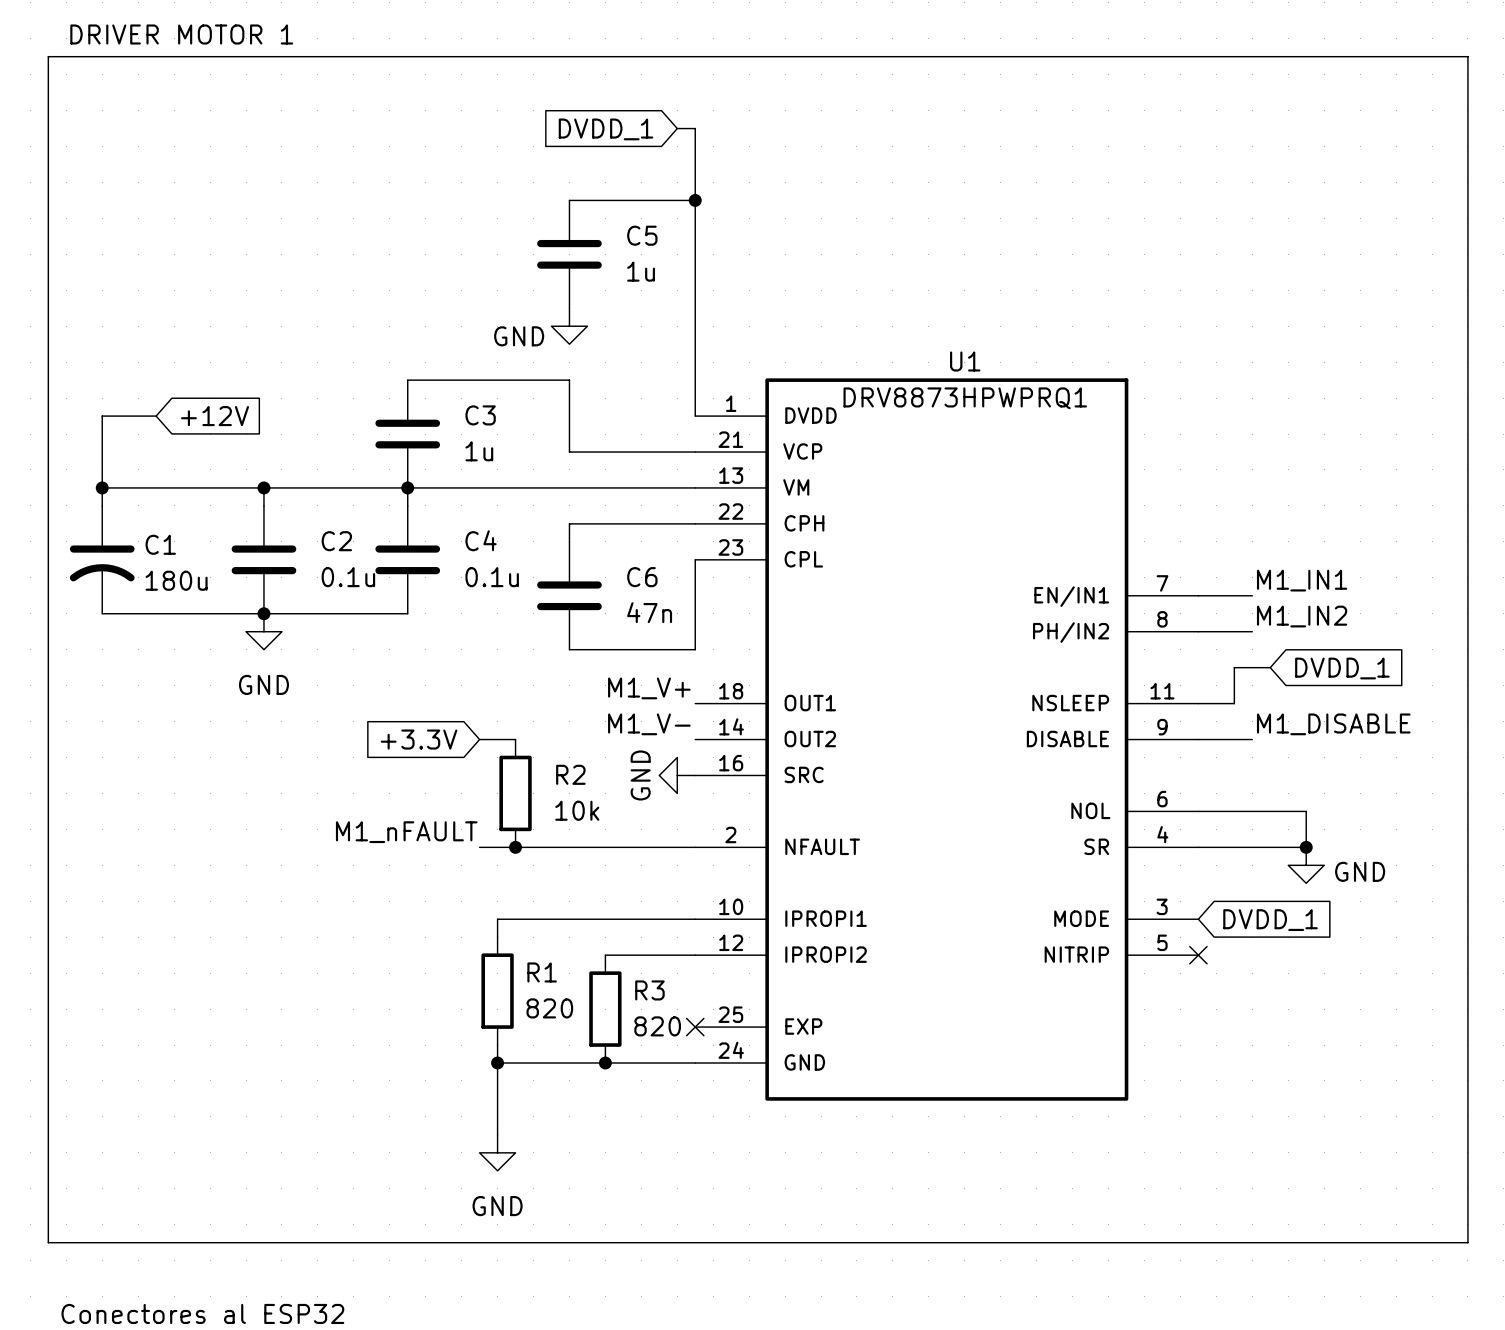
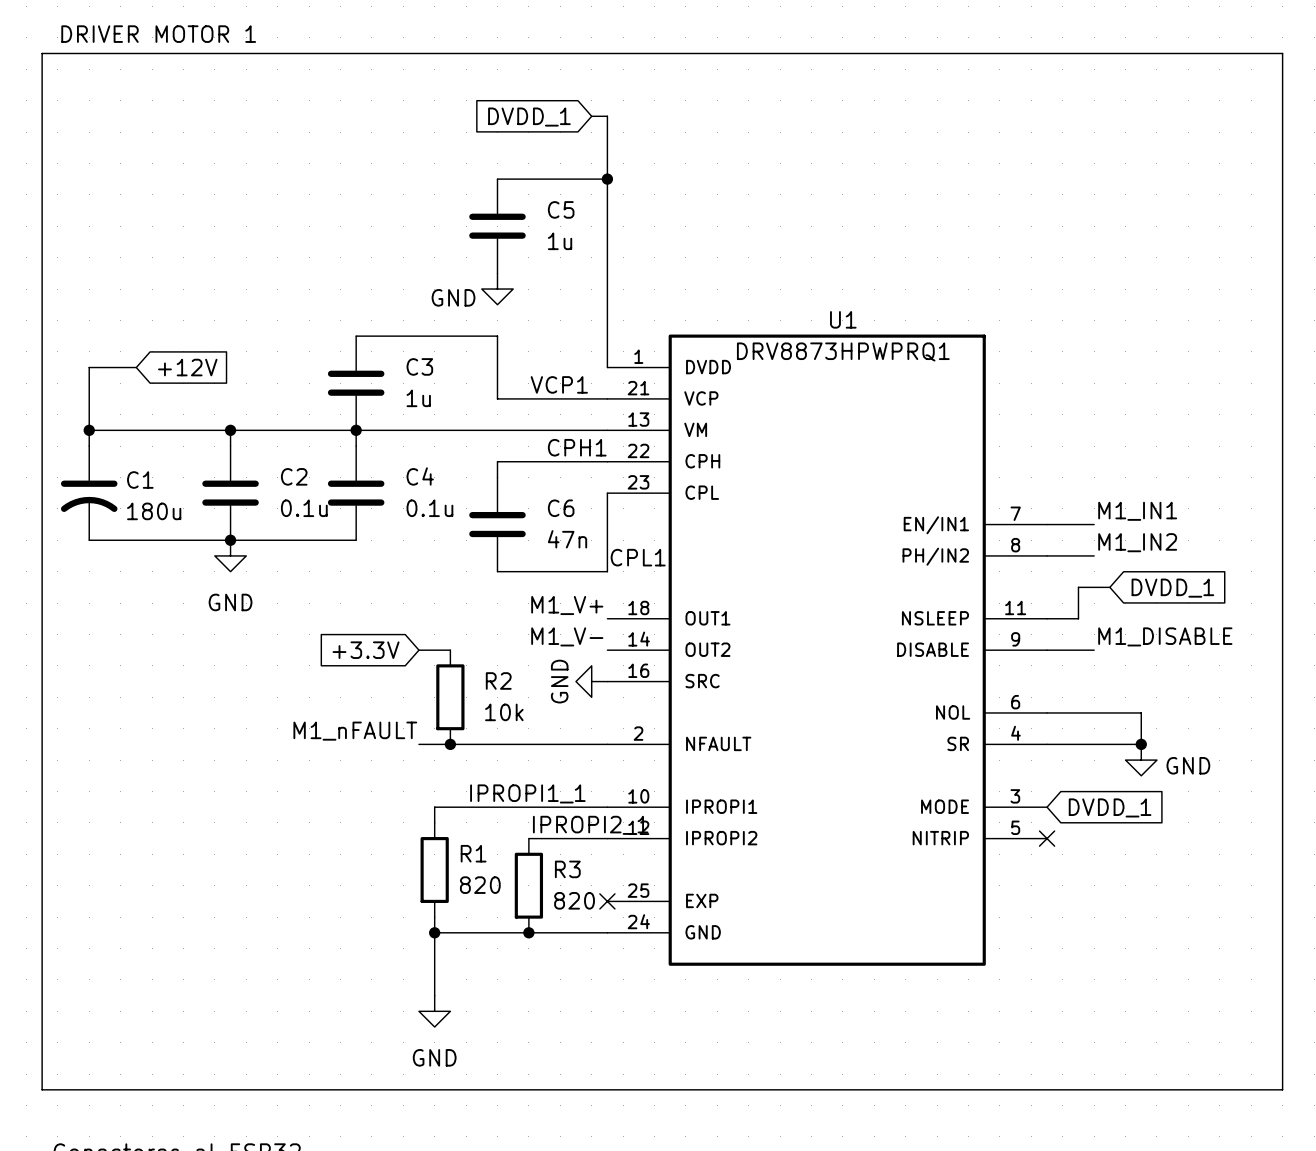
label: none -> VCP1 (559, 384)
label: none -> CPH1 (577, 447)
label: none -> CPL1 (638, 557)
label: none -> IPROPI1_1 (527, 793)
label: none -> IPROPI2_1 (590, 825)

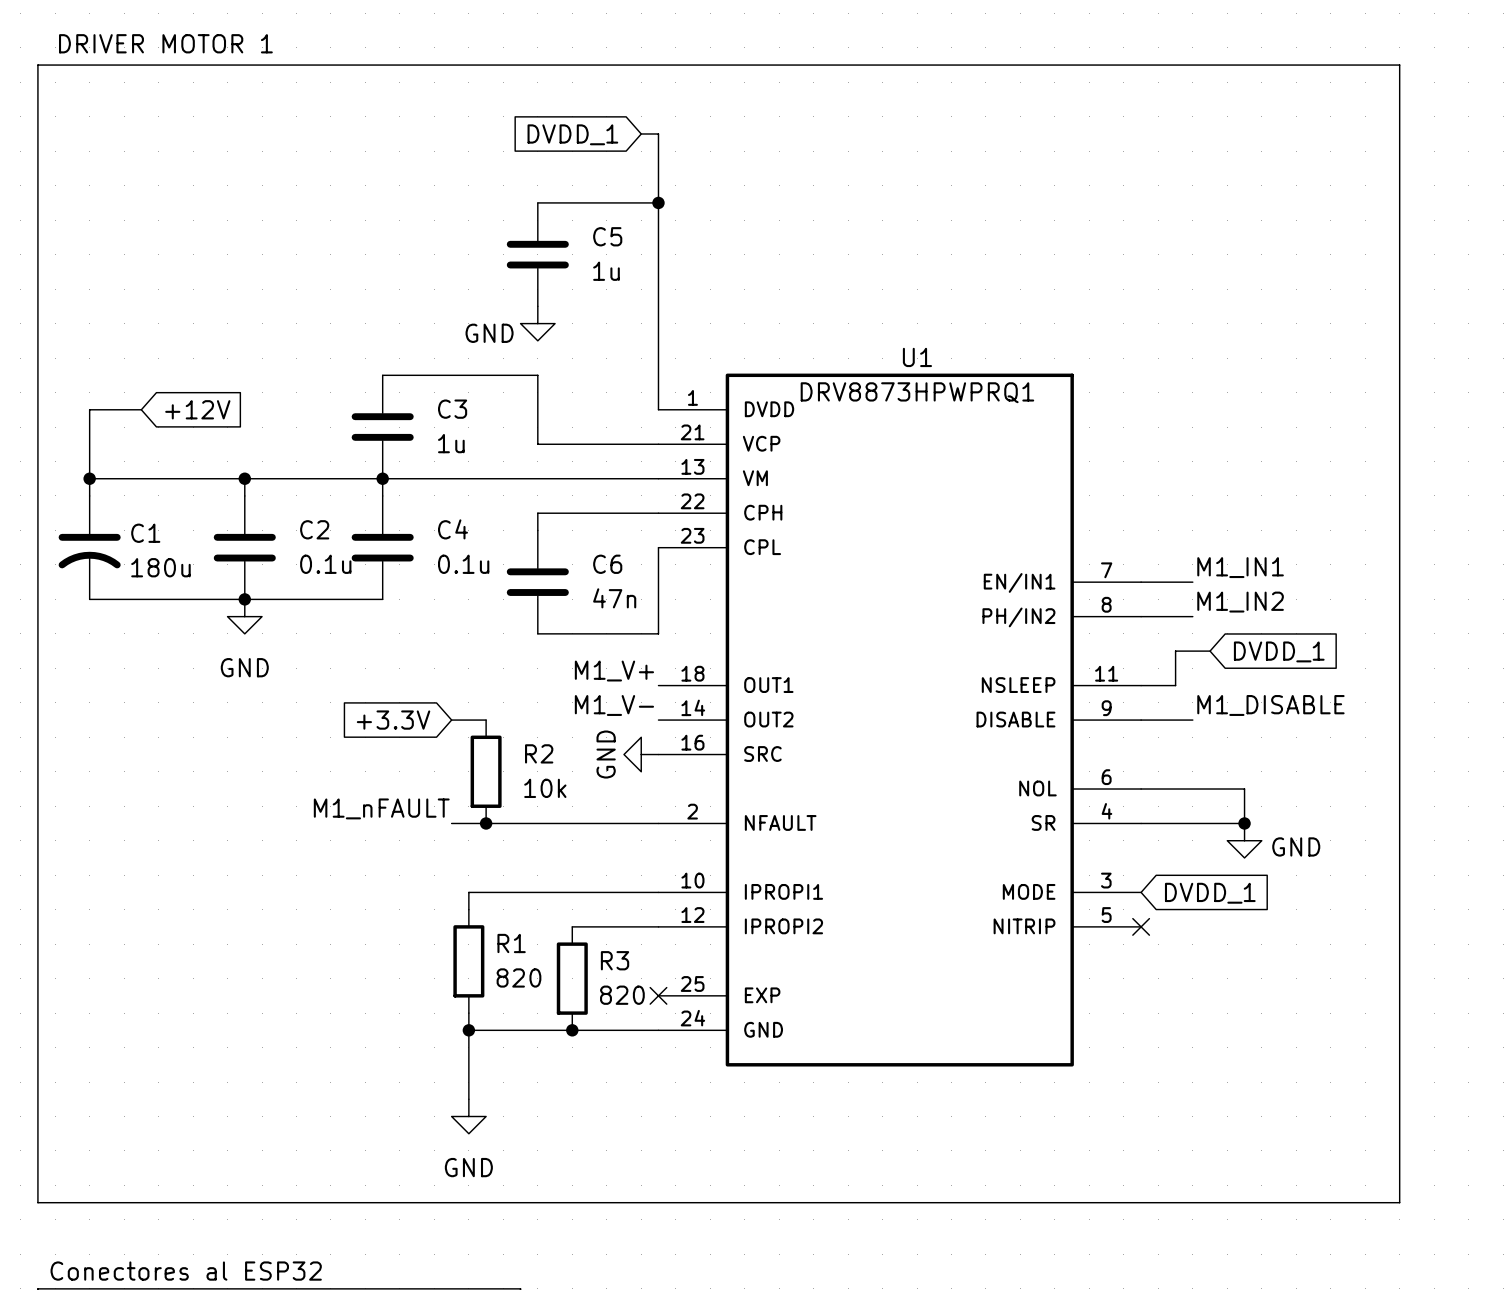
label: VCP1 (559, 384) -> none
label: CPH1 (577, 447) -> none
label: CPL1 (638, 557) -> none
label: IPROPI1_1 (527, 793) -> none
label: IPROPI2_1 (590, 825) -> none

